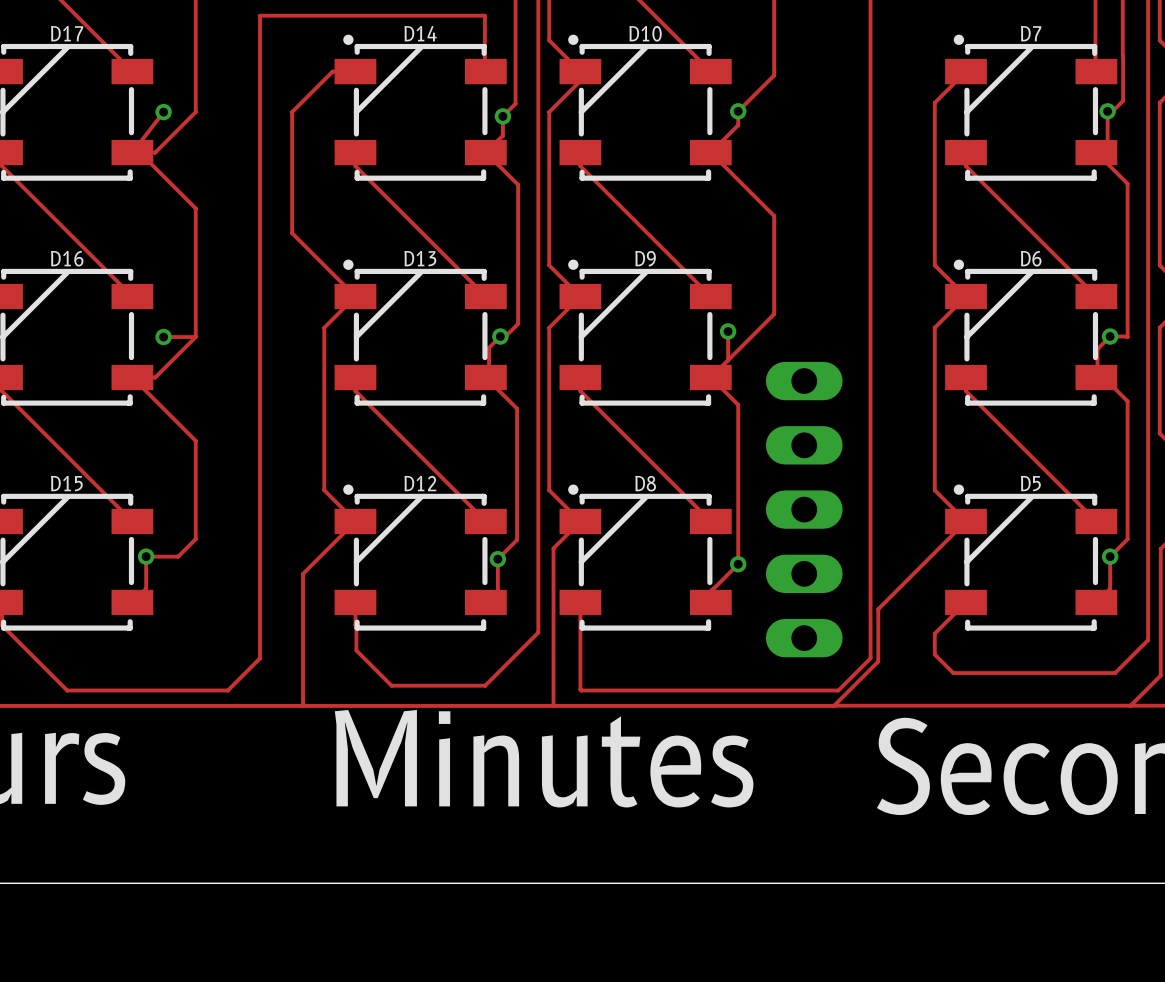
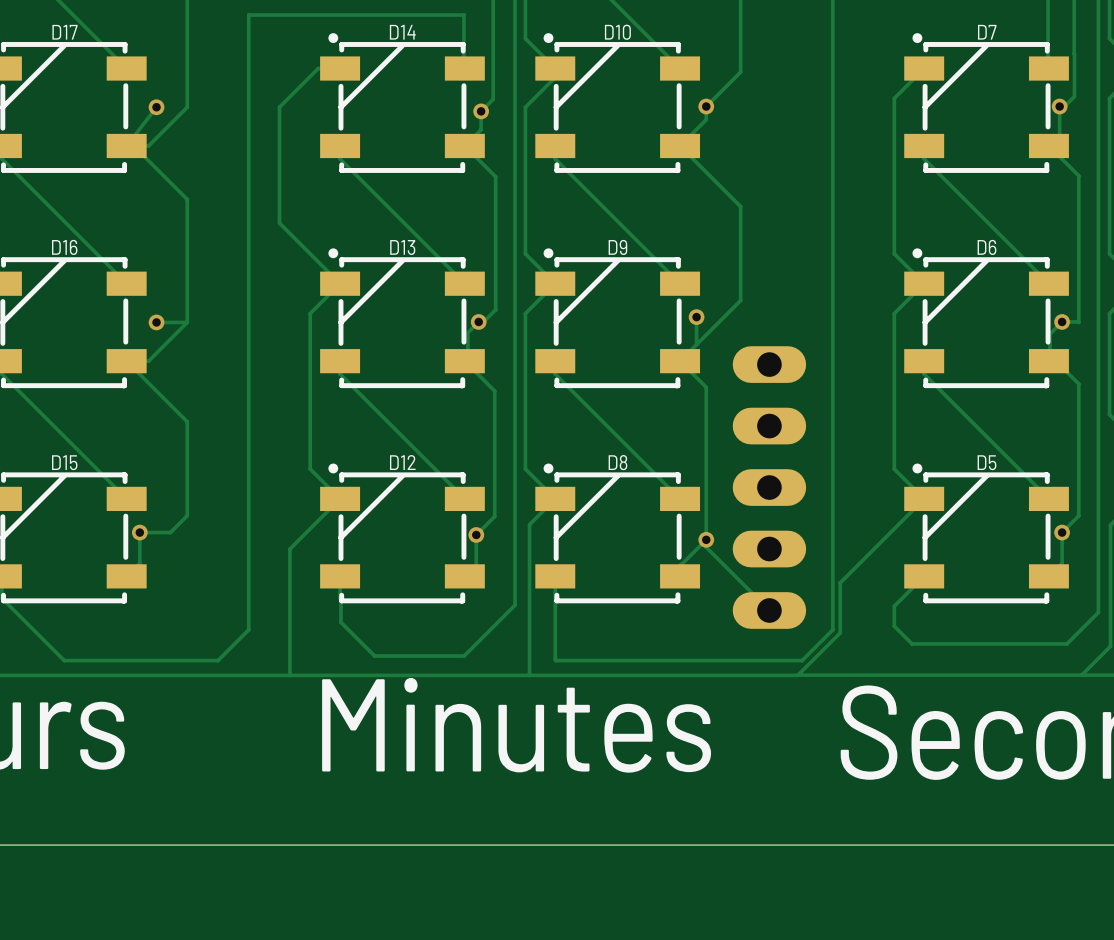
track: none -> (706, 539) (706, 547) (769, 610)

